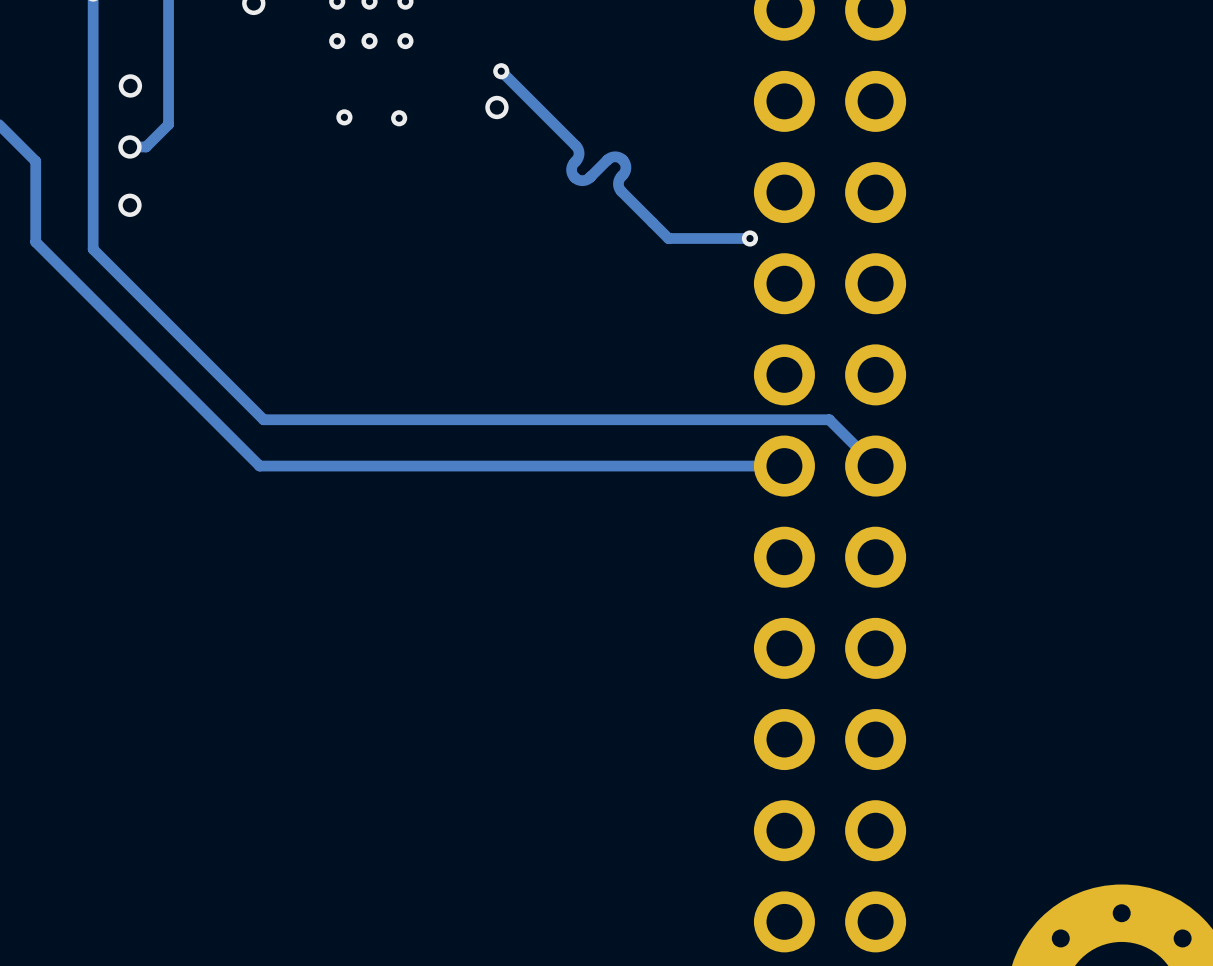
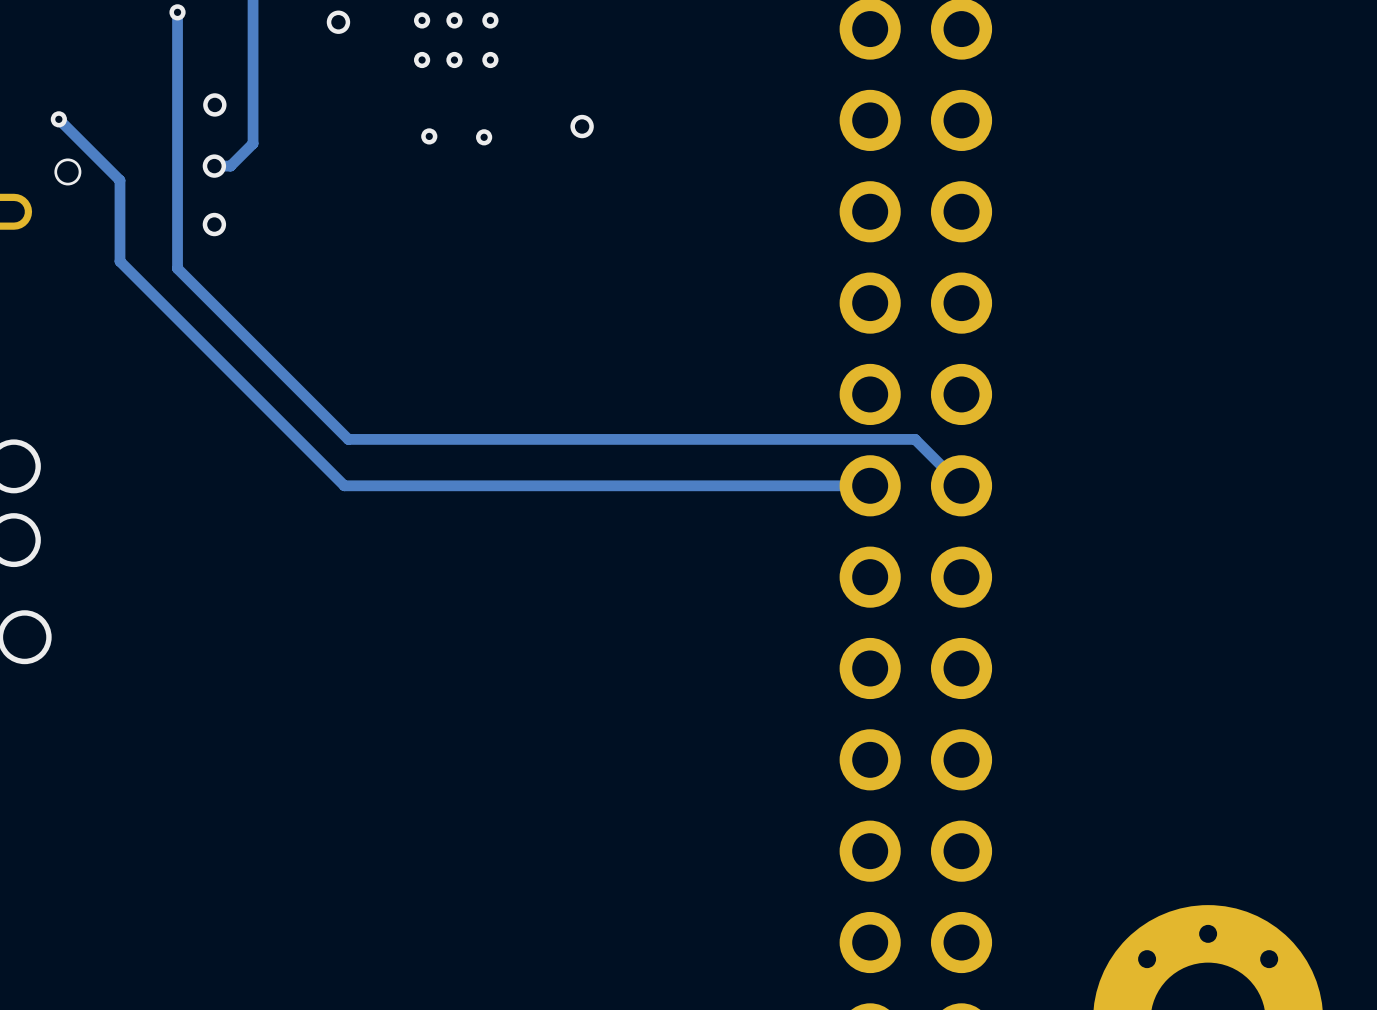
track: (501, 71) (577, 147) (578, 155) (571, 169) (576, 179) (587, 179) (609, 158) (618, 157) (624, 161) (625, 167) (618, 181) (620, 189) (668, 238) (749, 238) -> none
via: (501, 71) -> none
via: (749, 238) -> none

